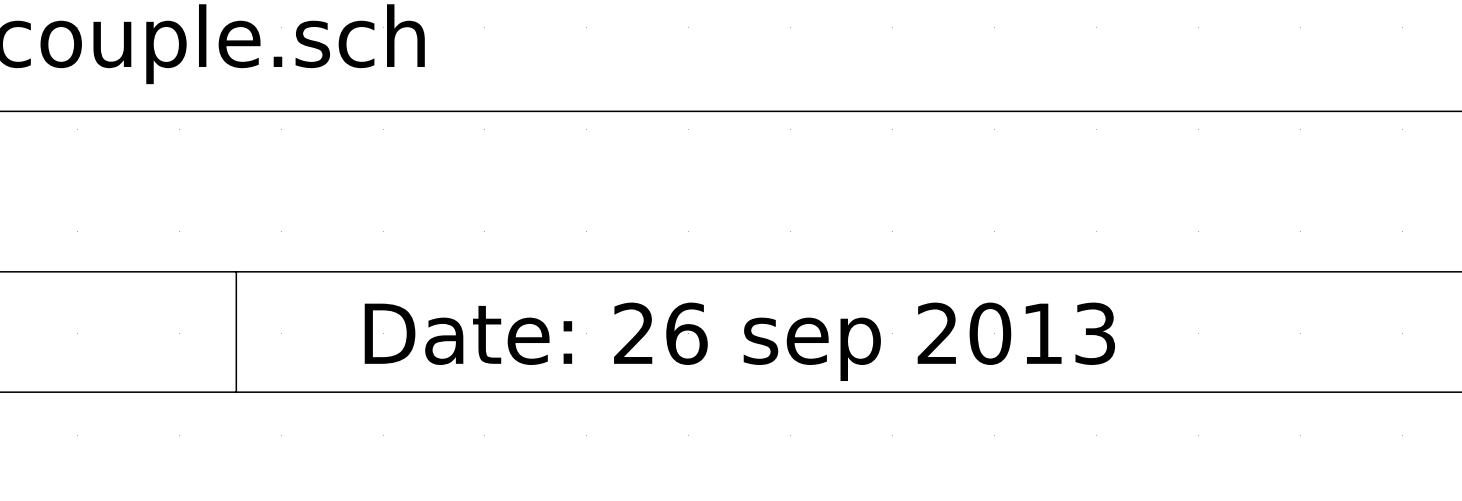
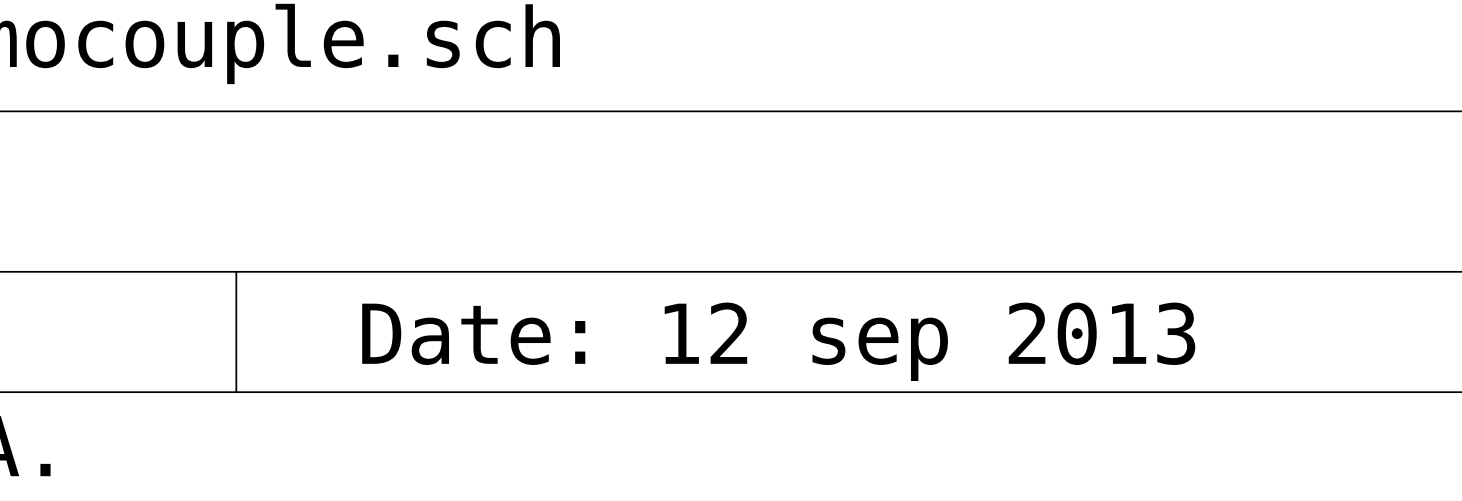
title block: Date: 26 sep 2013 (739, 341) -> Date: 12 sep 2013 (778, 341)

